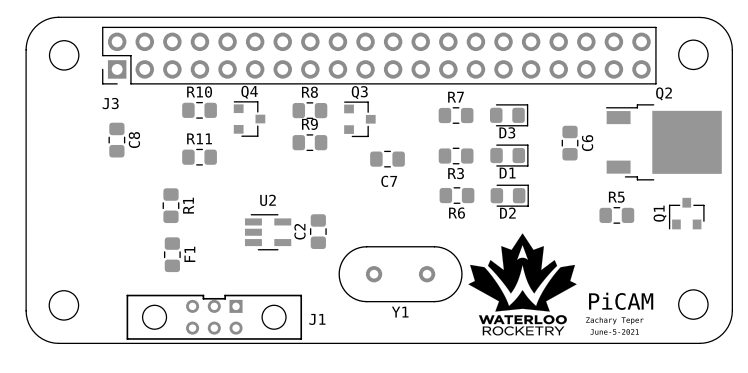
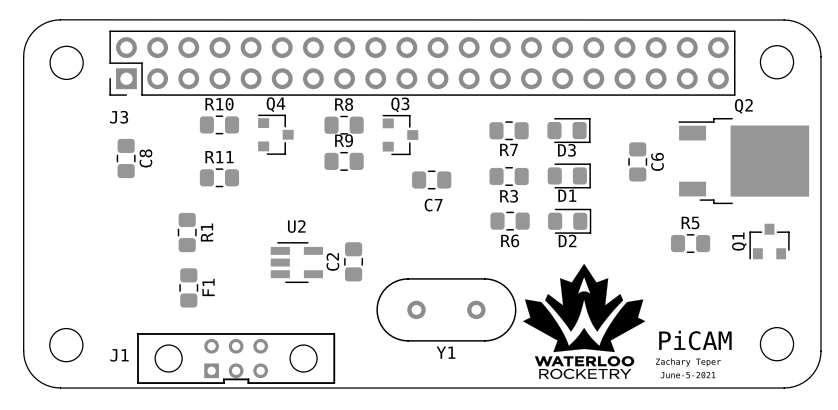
R7 name position: R7 (456, 97) -> R7 (509, 149)
J1 rotation: 0° (214, 317) -> 180° (236, 358)

